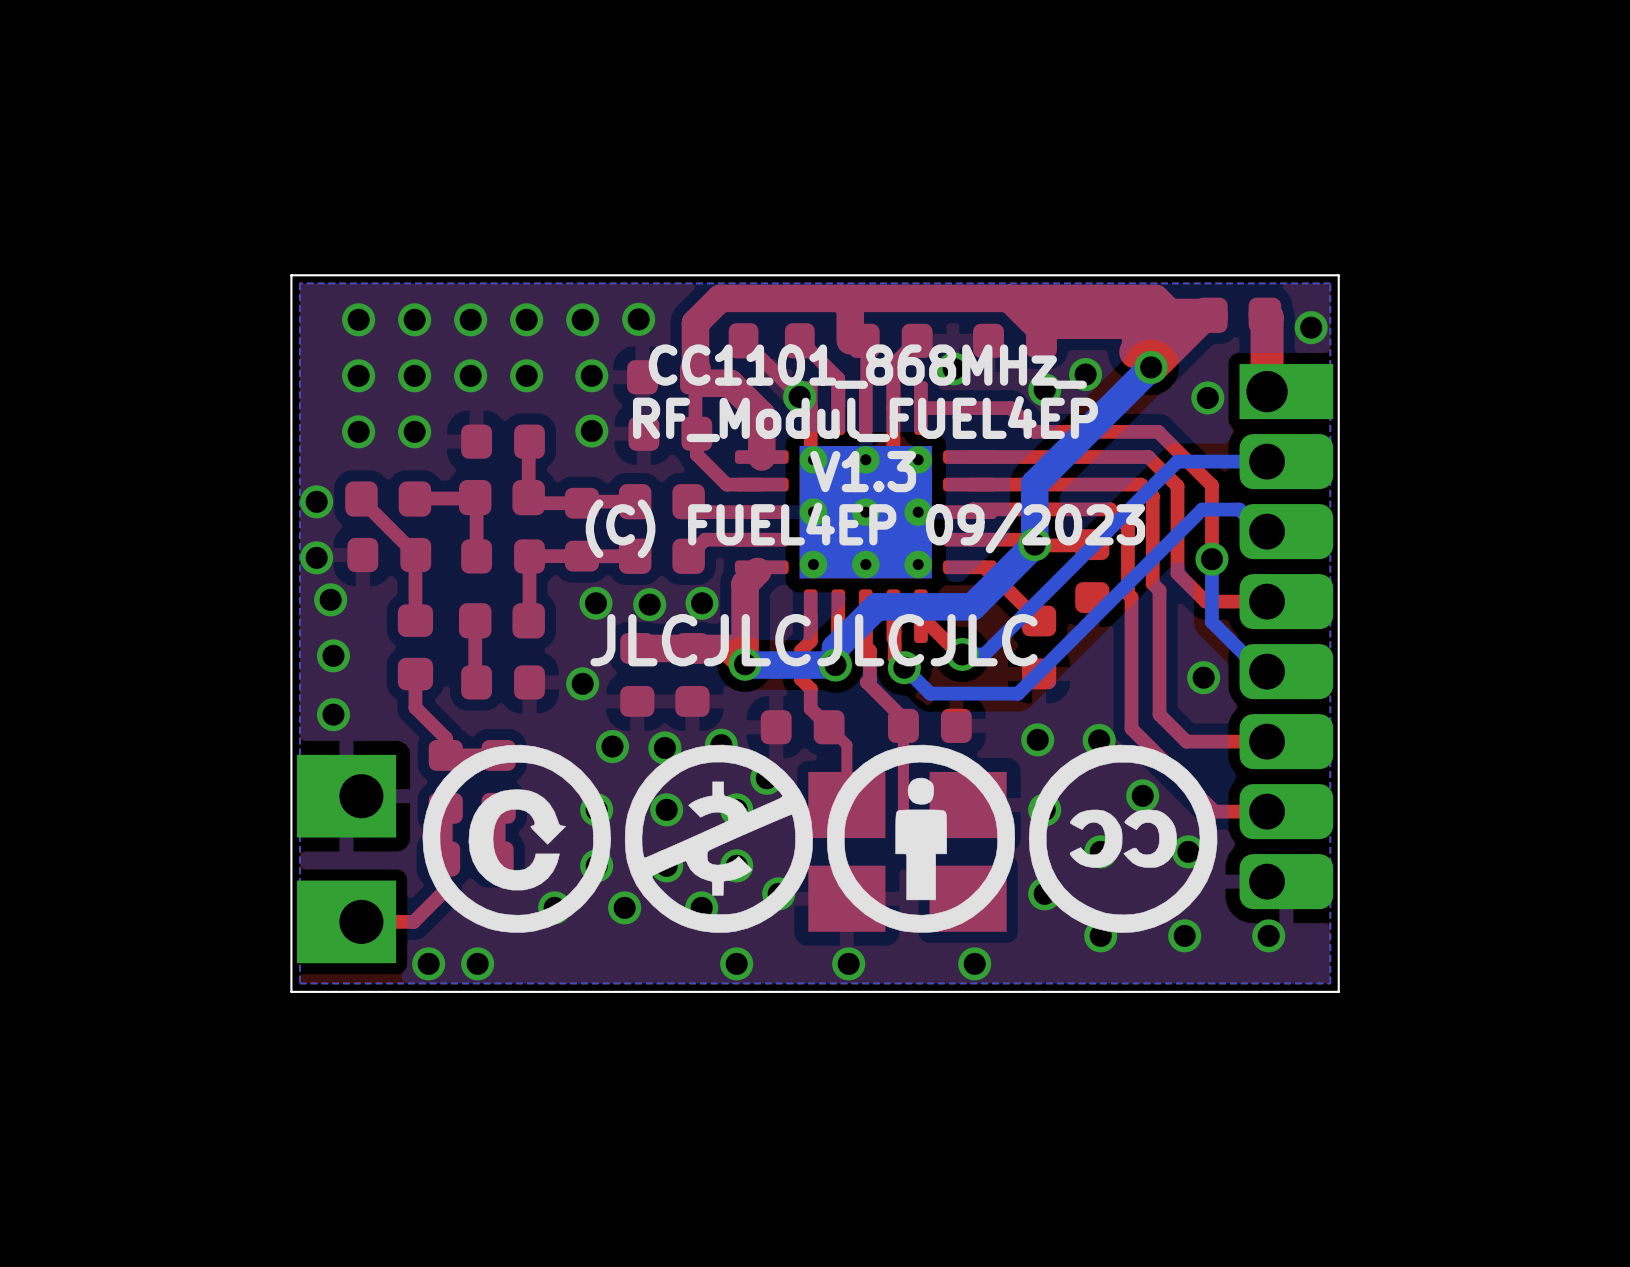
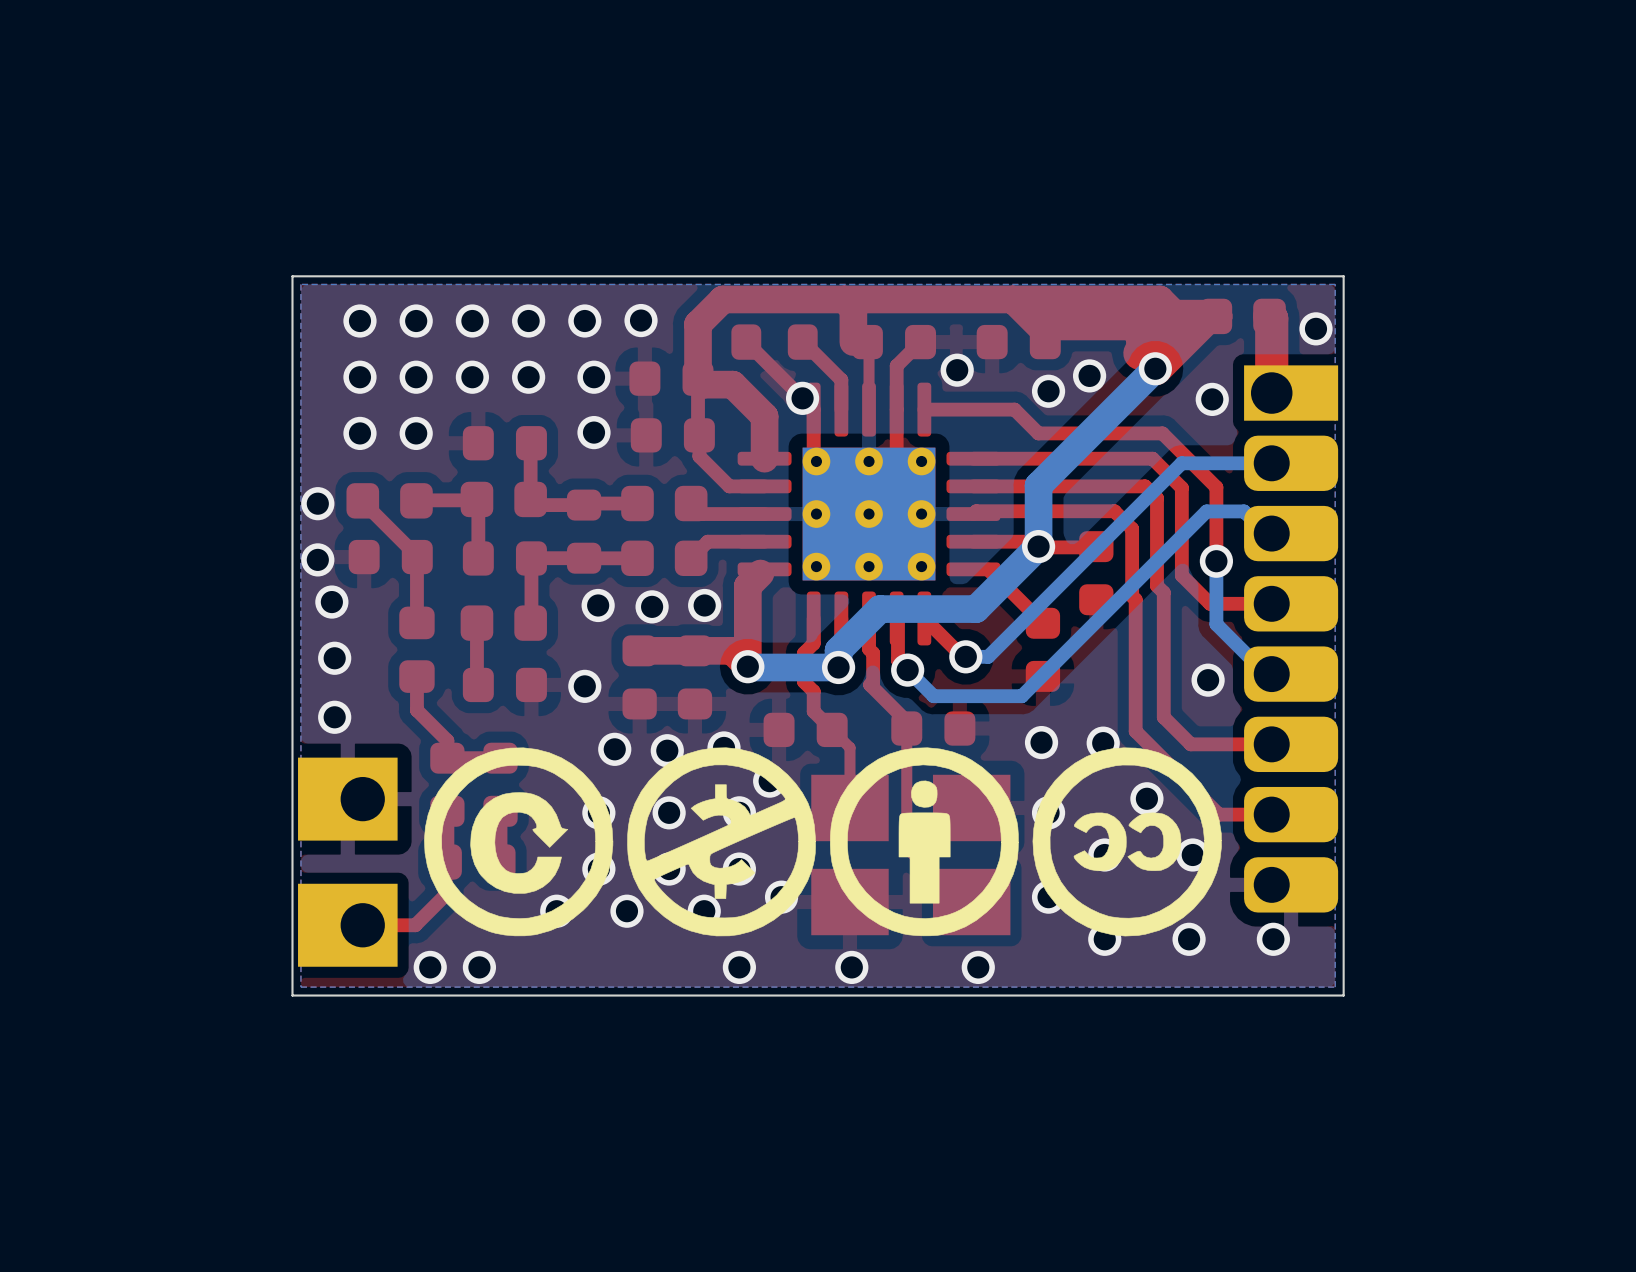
text: CC1101_868MHz_ (867, 366) -> none
text: RF_Modul_FUEL4EP (865, 419) -> none
text: V1.3 (863, 471) -> none
text: (C) FUEL4EP 09/2023 (865, 528) -> none
text: JLCJLCJLCJLC (814, 640) -> none

